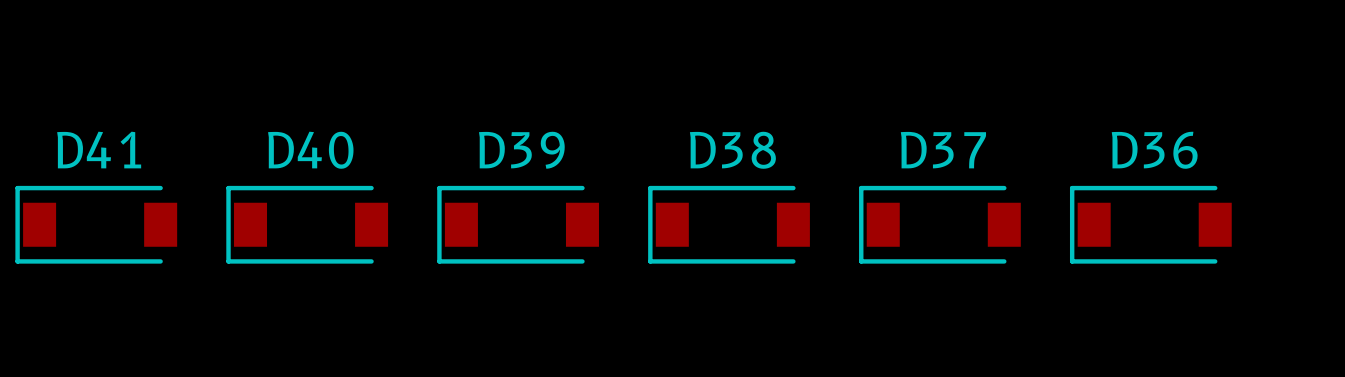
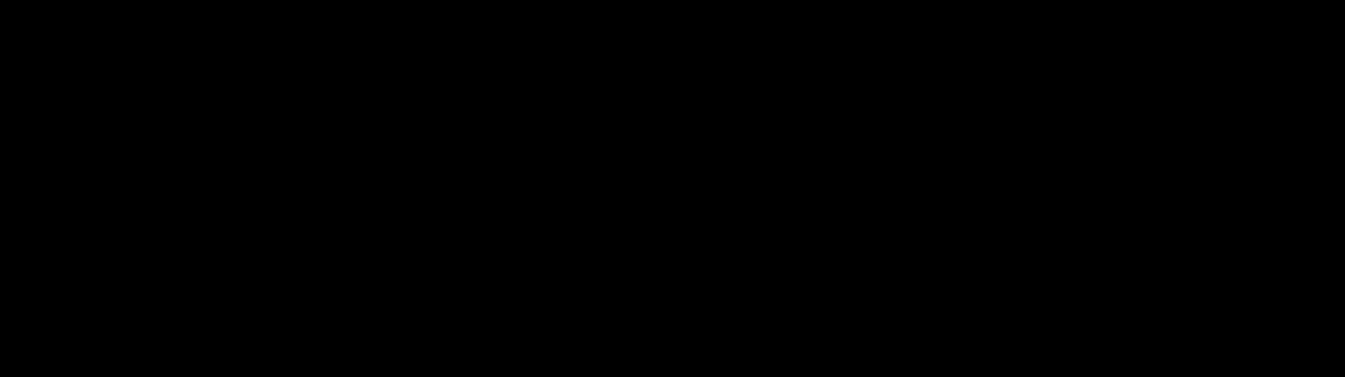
D41: (96, 224) -> none
D40: (307, 224) -> none
D39: (518, 224) -> none
D38: (729, 224) -> none
D37: (939, 224) -> none
D36: (1150, 224) -> none

